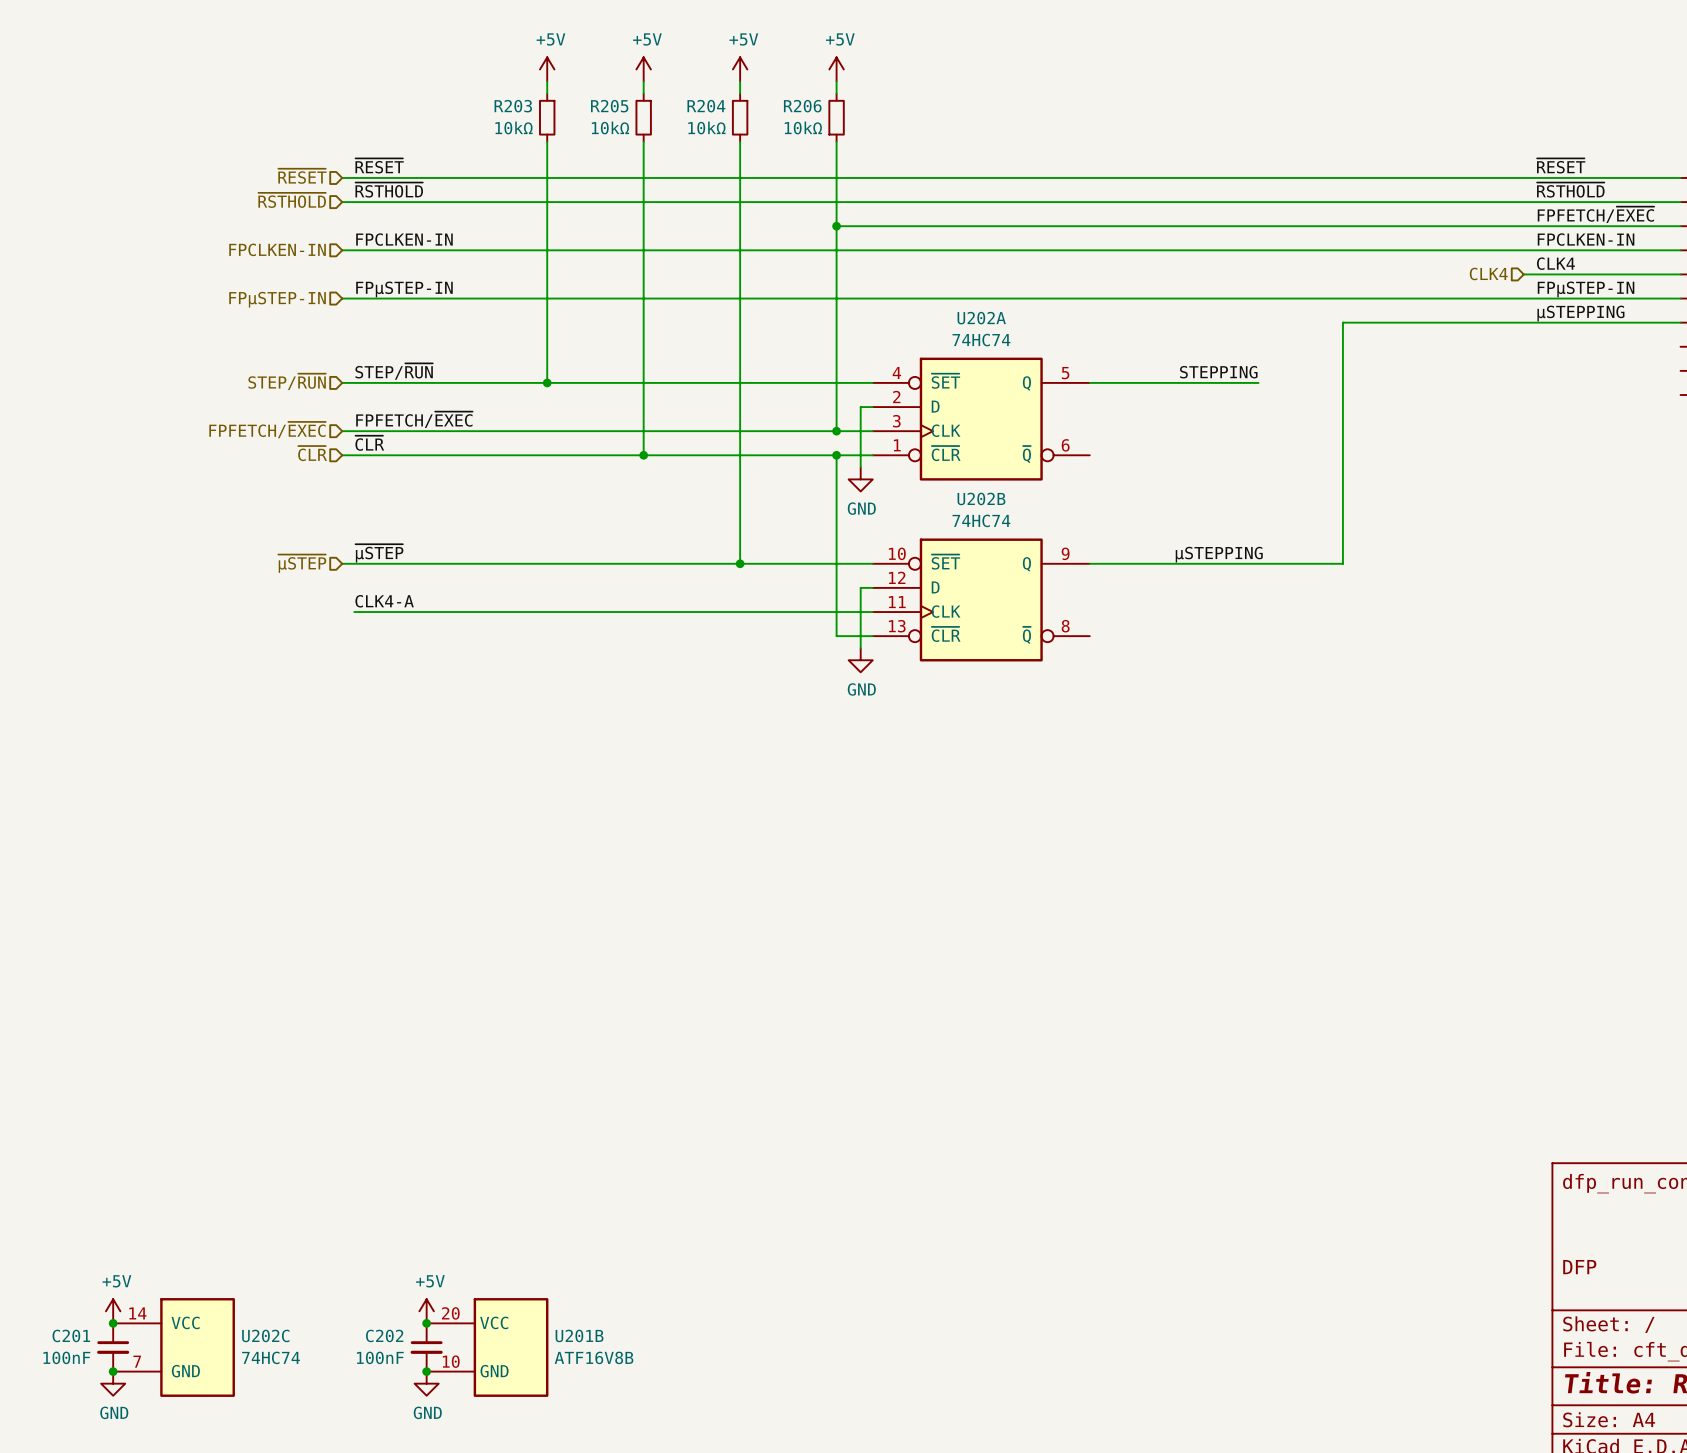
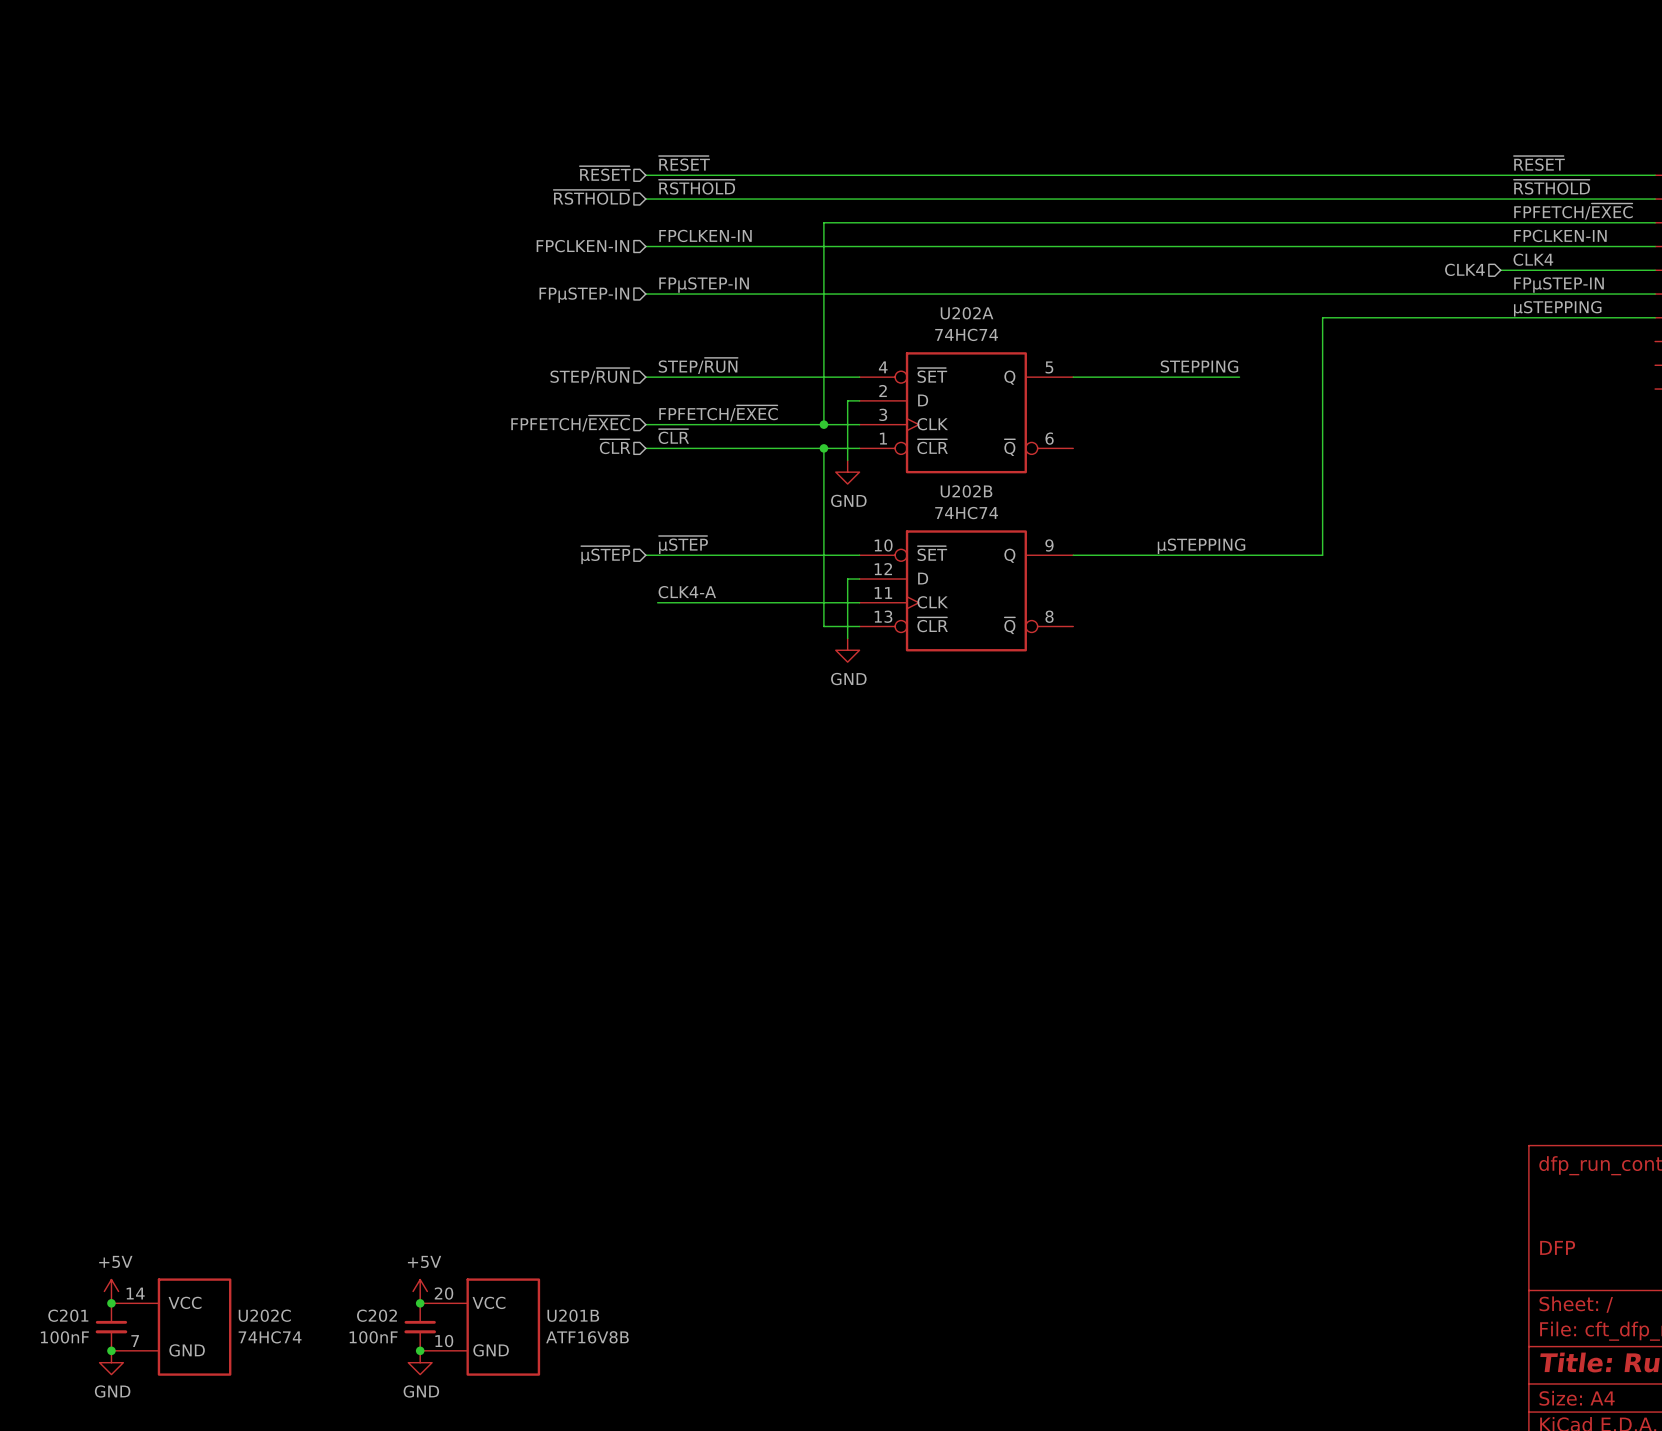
power symbol: +5V (547, 69) -> none
power symbol: +5V (643, 69) -> none
power symbol: +5V (740, 69) -> none
power symbol: +5V (836, 69) -> none
wire: (547, 81) (547, 93) -> none
wire: (643, 81) (643, 93) -> none
wire: (740, 81) (740, 93) -> none
wire: (836, 81) (836, 93) -> none
R203: 10kΩ (547, 117) -> none
R205: 10kΩ (643, 117) -> none
R204: 10kΩ (740, 117) -> none
R206: 10kΩ (836, 117) -> none
wire: (547, 141) (547, 382) -> none
wire: (643, 141) (643, 455) -> none
wire: (740, 141) (740, 563) -> none
wire: (836, 141) (836, 226) -> none
label: ~{RESET} (379, 165) -> none
label: none -> ~{RESET} (684, 163)
hierarchical label: ~{RESET} (302, 176) -> none
hierarchical label: none -> ~{RESET} (605, 173)
wire: (342, 177) (655, 177) -> none
label: ~{RSTHOLD} (389, 190) -> none
label: none -> ~{RSTHOLD} (696, 187)
hierarchical label: ~{RSTHOLD} (292, 200) -> none
hierarchical label: none -> ~{RSTHOLD} (591, 197)
wire: (342, 202) (655, 202) -> none
junction: (836, 226) -> none
label: FPCLKEN-IN (404, 239) -> none
label: none -> FPCLKEN-IN (705, 235)
hierarchical label: FPCLKEN-IN (277, 249) -> none
hierarchical label: none -> FPCLKEN-IN (582, 246)
wire: (342, 250) (655, 250) -> none
label: FPµSTEP-IN (404, 289) -> none
label: none -> FPµSTEP-IN (704, 285)
wire: (342, 298) (655, 298) -> none
hierarchical label: FPµSTEP-IN (277, 299) -> none
hierarchical label: none -> FPµSTEP-IN (584, 295)
label: STEP∕~{RUN} (394, 371) -> none
label: none -> STEP∕~{RUN} (698, 365)
hierarchical label: STEP∕~{RUN} (287, 381) -> none
hierarchical label: none -> STEP∕~{RUN} (590, 376)
wire: (342, 382) (655, 382) -> none
junction: (547, 382) -> none
label: FPFETCH∕~{EXEC} (414, 419) -> none
label: none -> FPFETCH∕~{EXEC} (718, 413)
hierarchical label: FPFETCH∕~{EXEC} (267, 430) -> none
hierarchical label: none -> FPFETCH∕~{EXEC} (570, 423)
wire: (342, 431) (655, 431) -> none
label: ~{CLR} (369, 443) -> none
label: none -> ~{CLR} (673, 436)
hierarchical label: ~{CLR} (312, 453) -> none
hierarchical label: none -> ~{CLR} (615, 446)
wire: (342, 455) (655, 455) -> none
junction: (643, 455) -> none
label: ~{µSTEP} (379, 553) -> none
label: none -> ~{µSTEP} (683, 544)
hierarchical label: ~{µSTEP} (302, 563) -> none
wire: (342, 563) (655, 563) -> none
hierarchical label: none -> ~{µSTEP} (605, 555)
junction: (740, 563) -> none
label: CLK4-A (384, 601) -> none
label: none -> CLK4-A (687, 592)
wire: (354, 612) (667, 612) -> none

